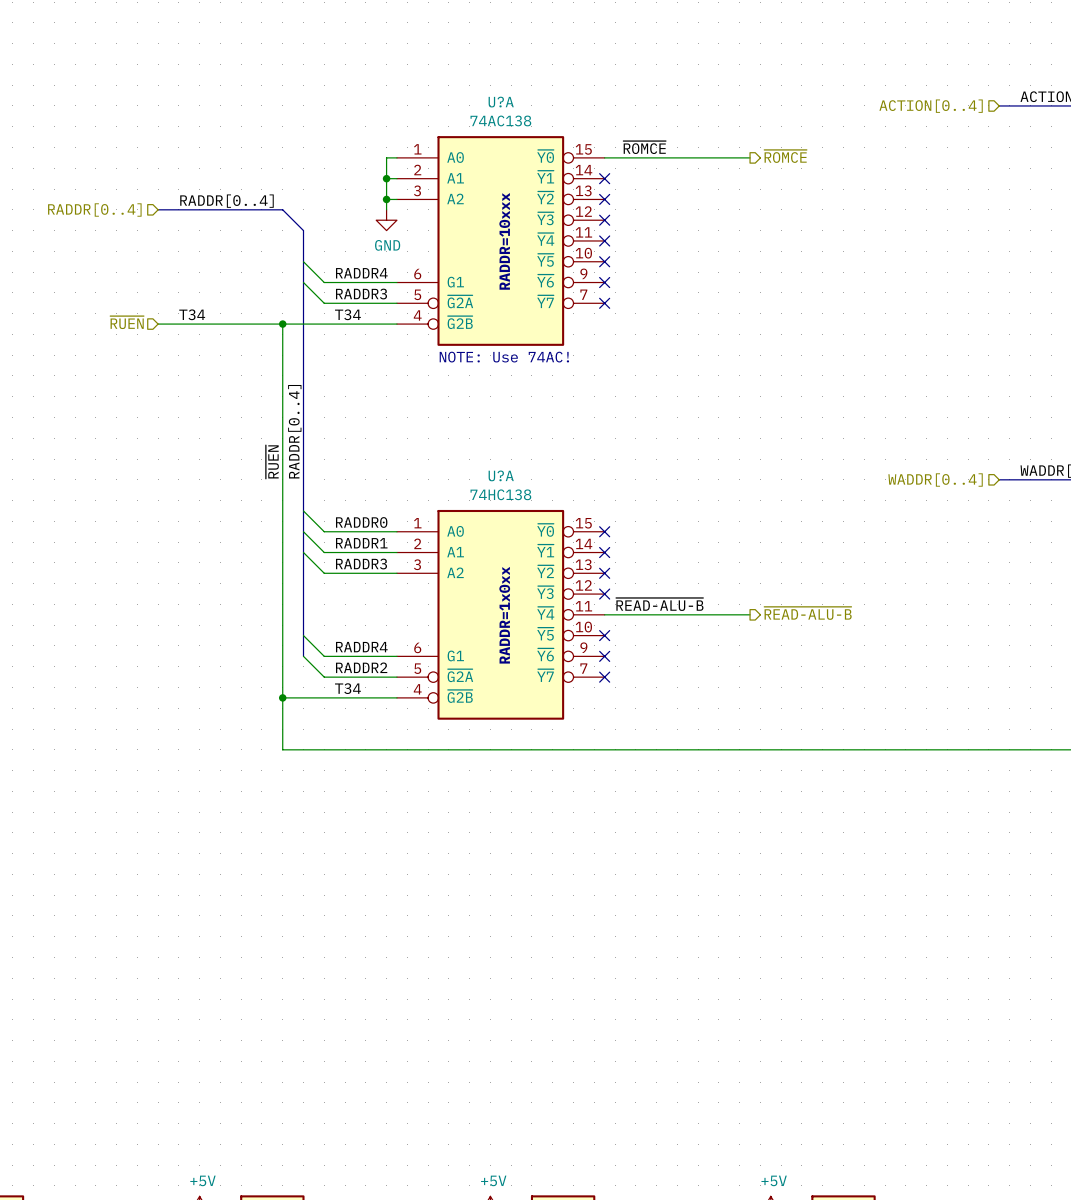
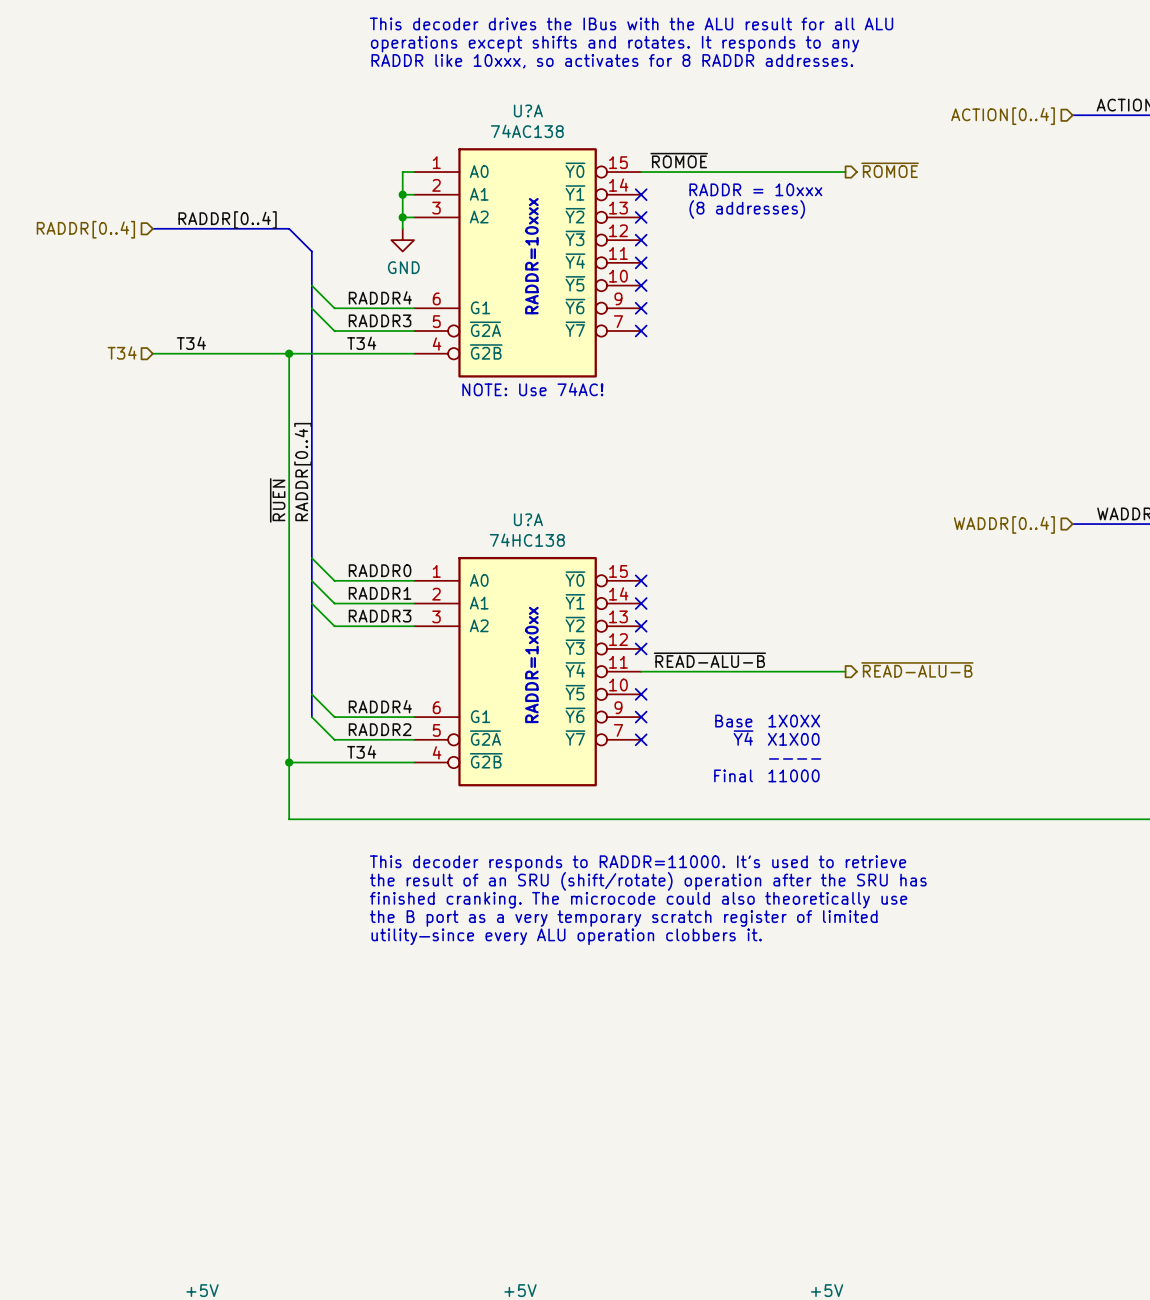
text: none -> This decoder drives the IBus with the ALU result for all ALU (631, 23)
text: none -> operations except shifts and rotates. It responds to any (615, 44)
text: none -> RADDR like 10xxx, so activates for 8 RADDR addresses. (612, 61)
label: ~{ROMCE} (644, 147) -> ~{ROMOE} (679, 160)
hierarchical label: ~{ROMCE} (785, 156) -> ~{ROMOE} (890, 170)
wire: none -> (800, 172) (845, 172)
text: none -> RADDR = 10xxx (755, 189)
text: none -> (8 addresses) (747, 209)
hierarchical label: ~{RUEN} (127, 322) -> T34 (122, 353)
hierarchical label position: ~{READ-ALU-B} (807, 613) -> ~{READ-ALU-B} (917, 669)
wire: none -> (800, 671) (845, 671)
text: none -> Base (733, 721)
text: none -> 1X0XX (794, 721)
text: none -> ~{Y4} (743, 738)
text: none -> X1X00 (793, 739)
text: none -> ---- (795, 758)
text: none -> Final (733, 775)
text: none -> 11000 (794, 775)
text: none -> This decoder responds to RADDR=11000. It's used to retrieve (638, 863)
text: none -> the result of an SRU (shift/rotate) operation after the SRU has (648, 881)
text: none -> finished cranking. The microcode could also theoretically use (638, 900)
text: none -> the B port as a very temporary scratch register of limited (623, 918)
text: none -> utility—since every ALU operation clobbers it. (566, 936)

